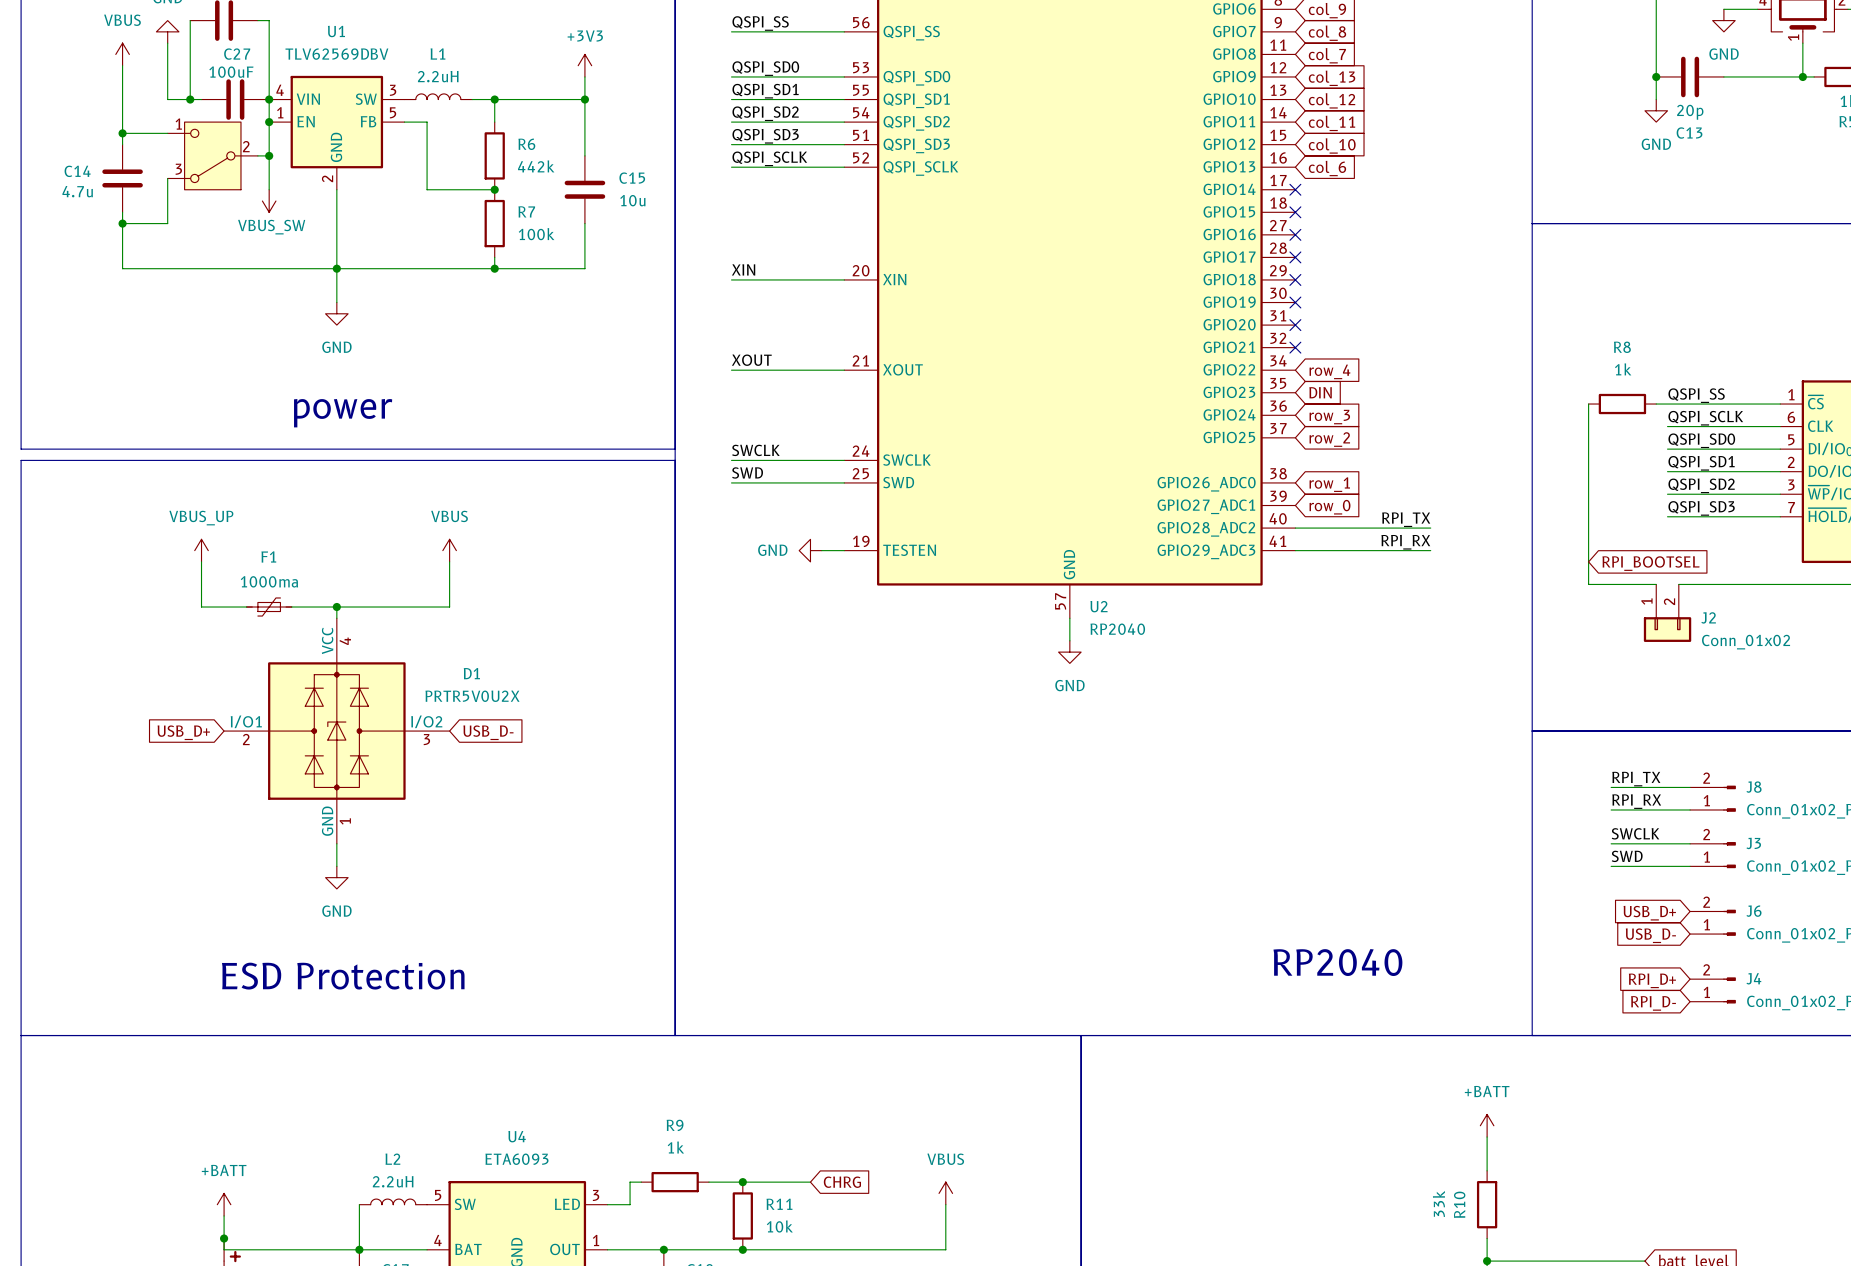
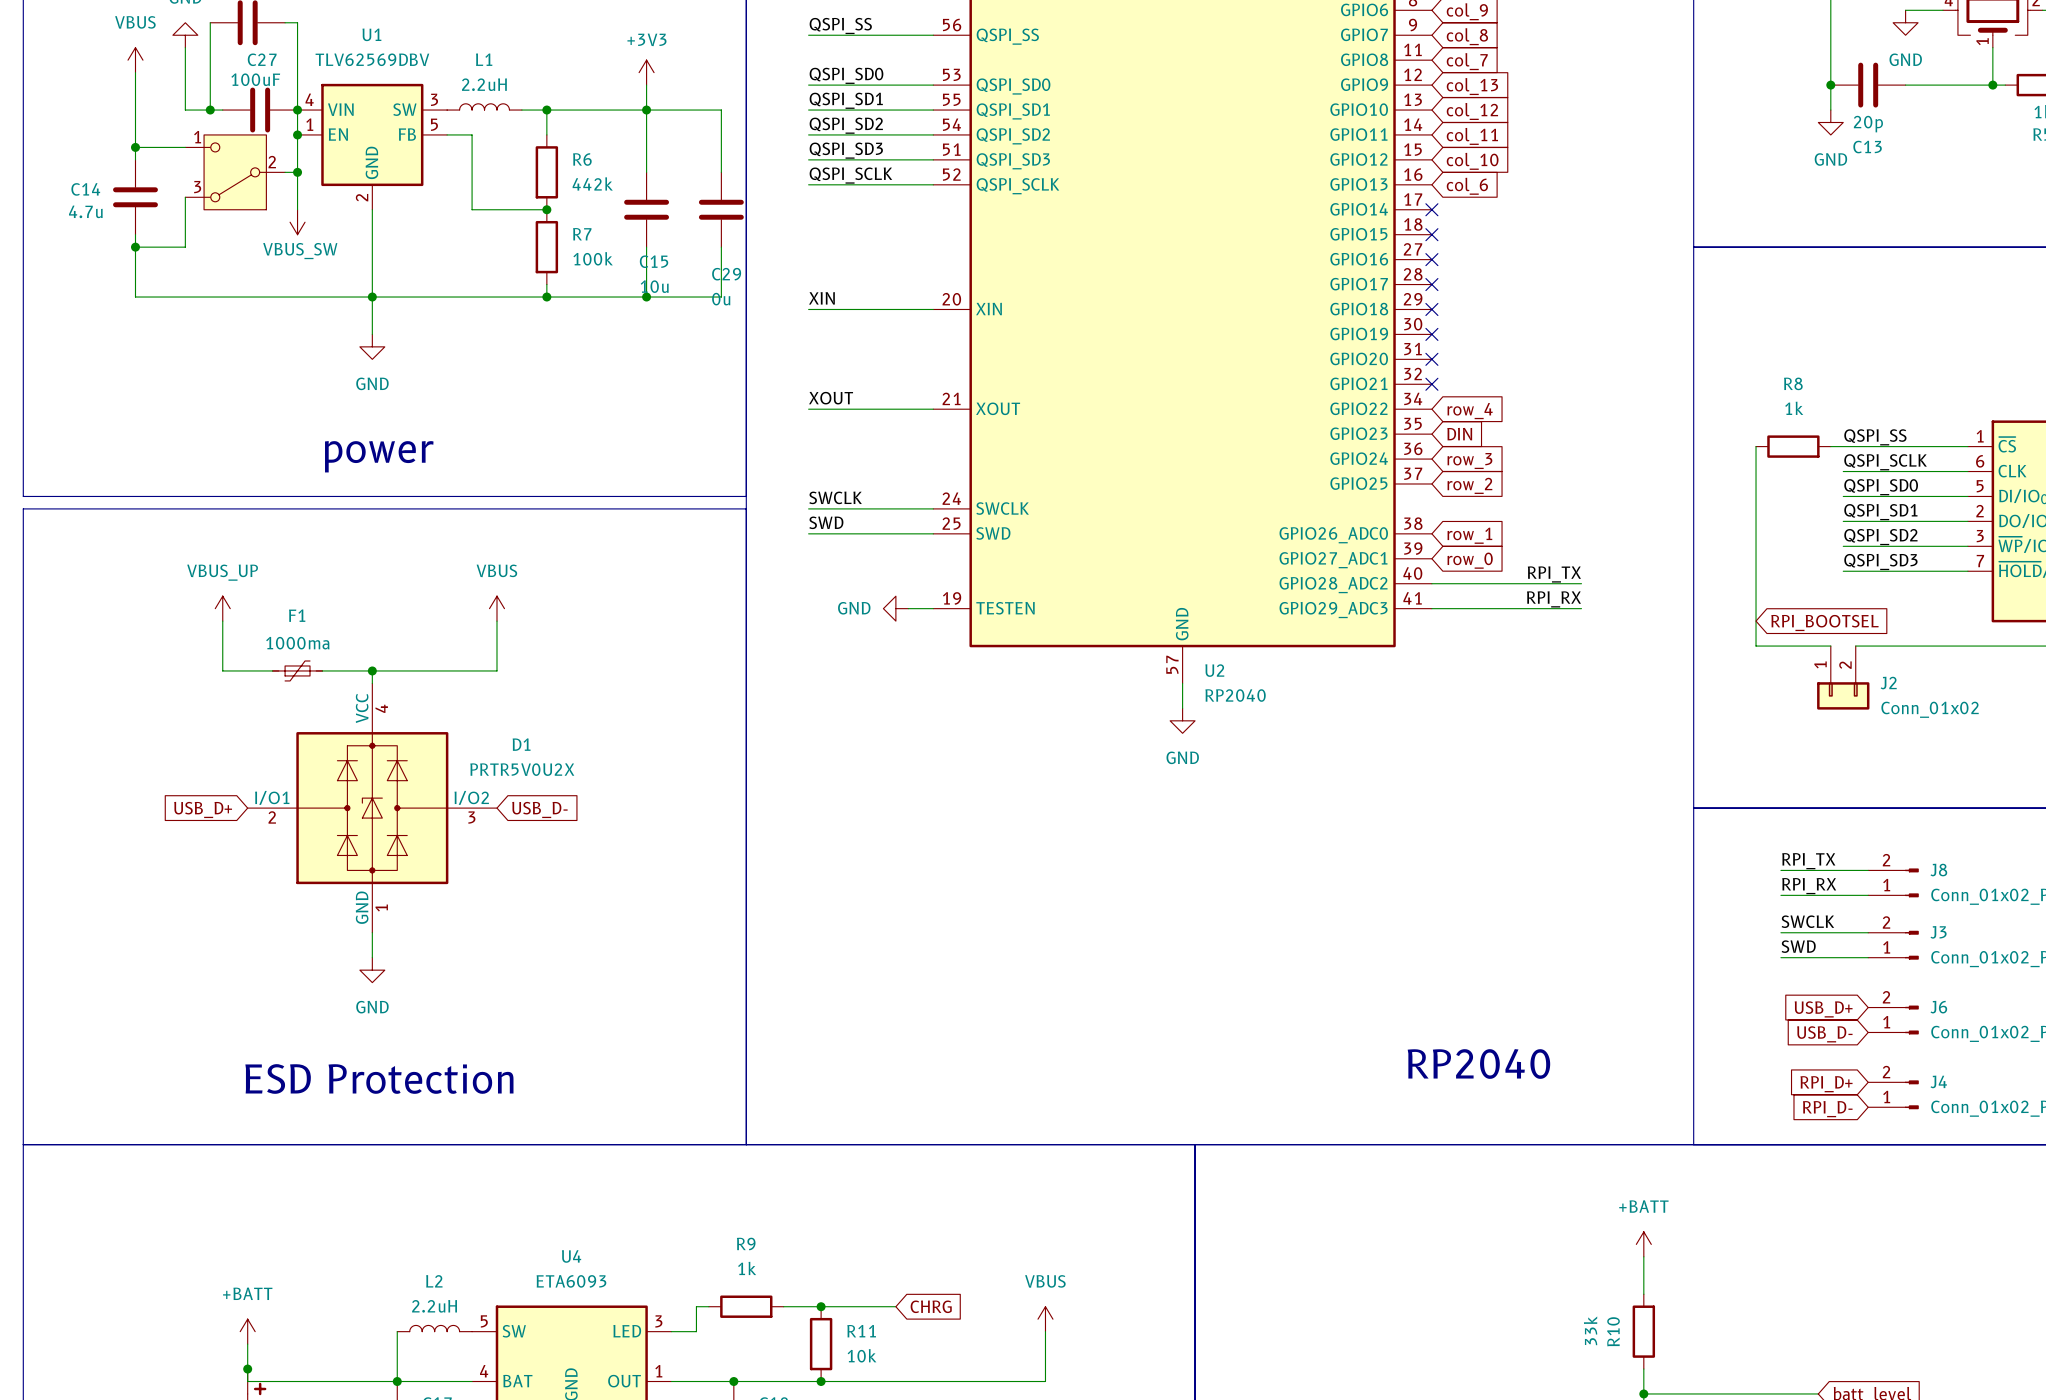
wire: none -> (646, 110) (721, 110) (721, 172)
C15 name position: C15 (632, 178) -> C15 (654, 261)
C29: none -> 0u (721, 209)
C15 value position: 10u (632, 200) -> 10u (654, 286)
wire: none -> (721, 247) (721, 297) (646, 297)
junction: none -> (646, 297)

